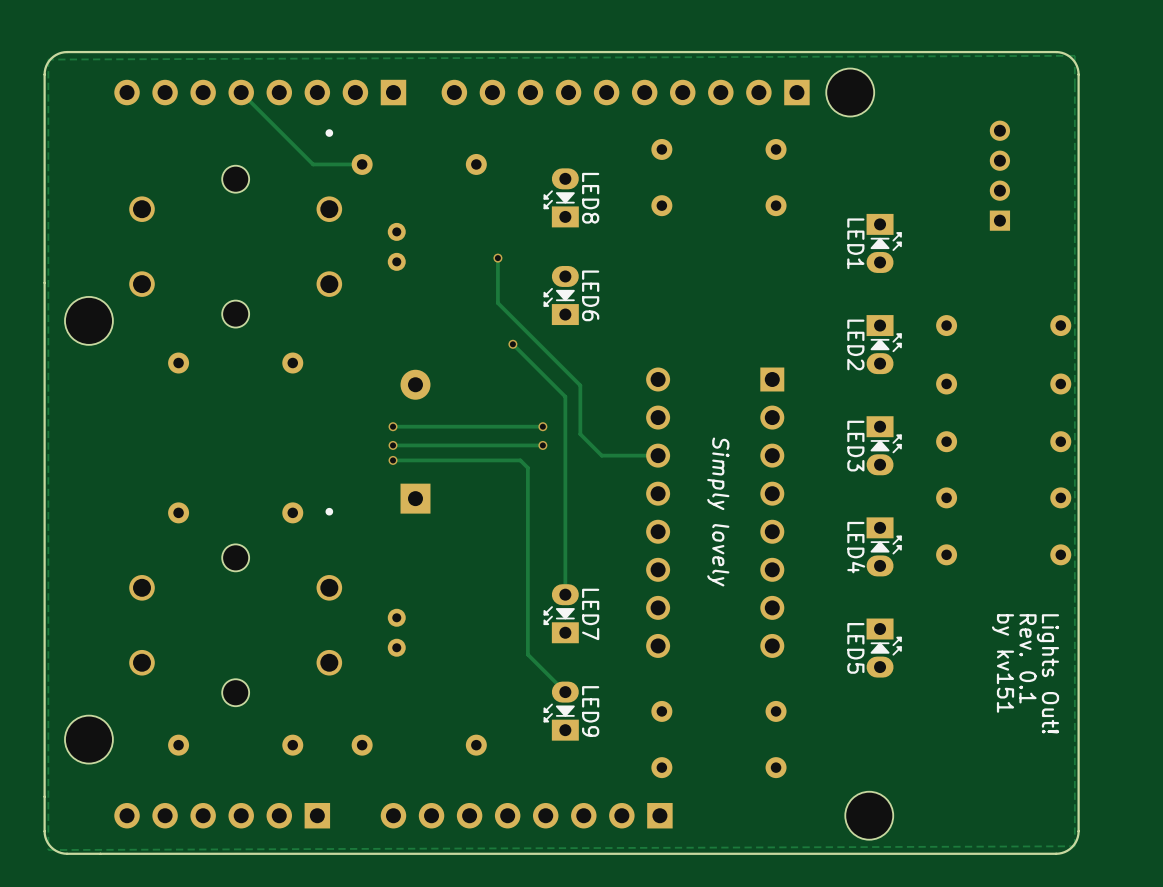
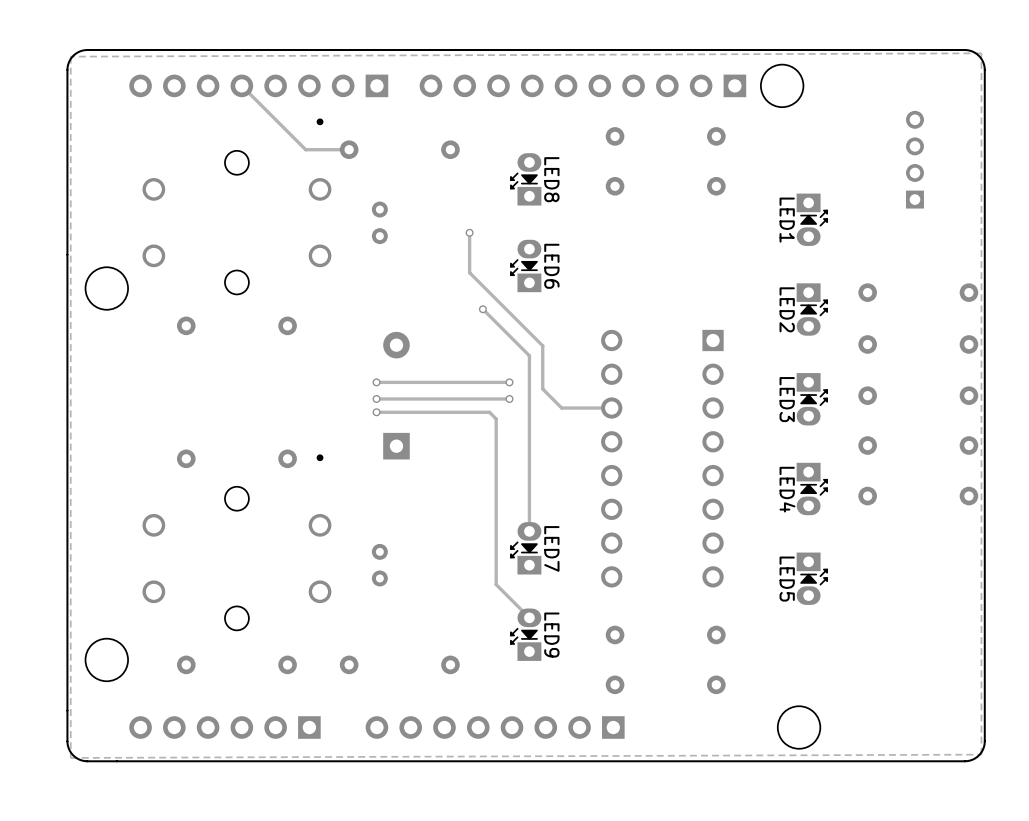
text: Simply lovely (718, 511) -> none
text: Rev. 0.1 (1027, 658) -> none
text: by kv151 (1003, 663) -> none
text: Lights Out! (1047, 673) -> none

